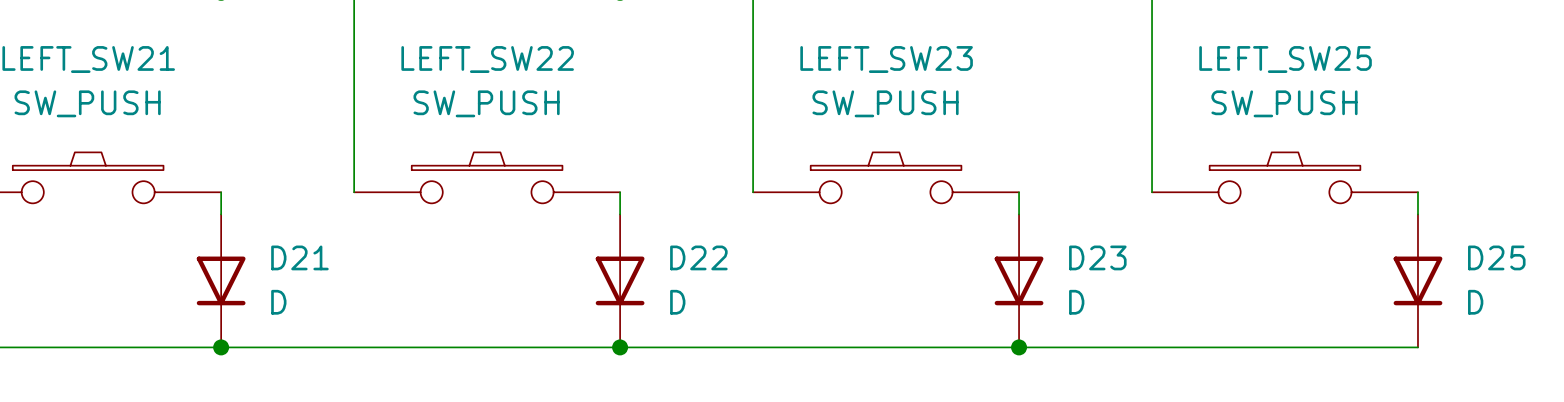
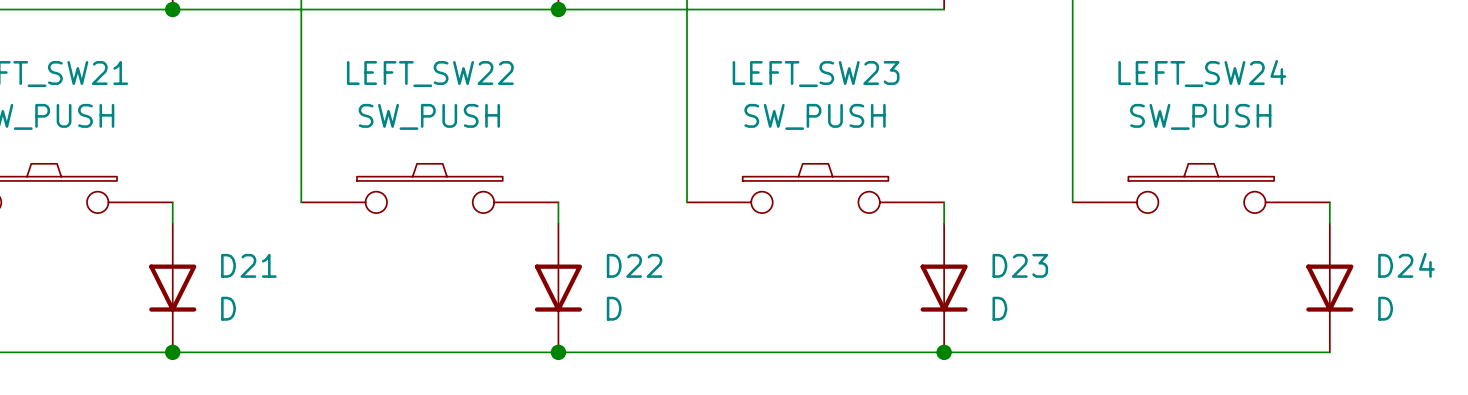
LEFT_SW25 name: LEFT_SW25 (1285, 59) -> LEFT_SW24 (1202, 73)
D25 name: D25 (1496, 257) -> D24 (1406, 265)

